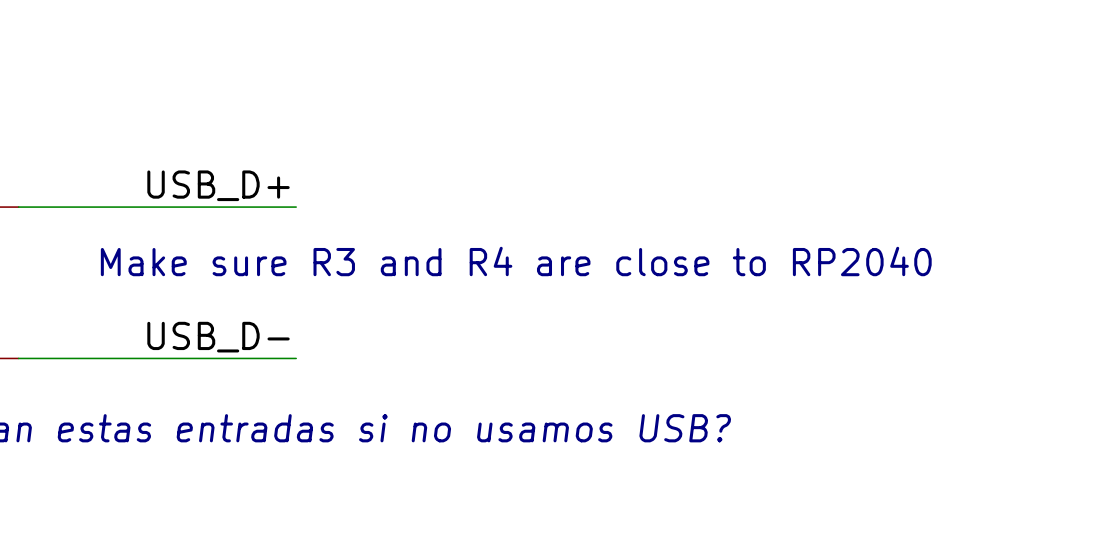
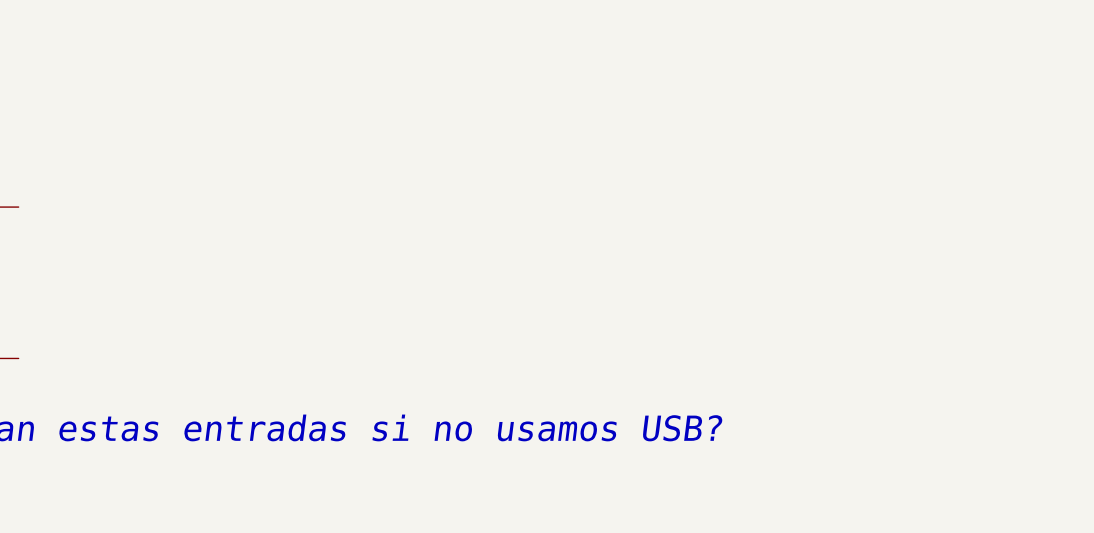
label: USB_D+ (218, 185) -> none
wire: (18, 207) (296, 207) -> none
text: Make sure R3 and R4 are close to RP2040 (516, 261) -> none
label: USB_D- (218, 337) -> none
wire: (18, 358) (296, 358) -> none

